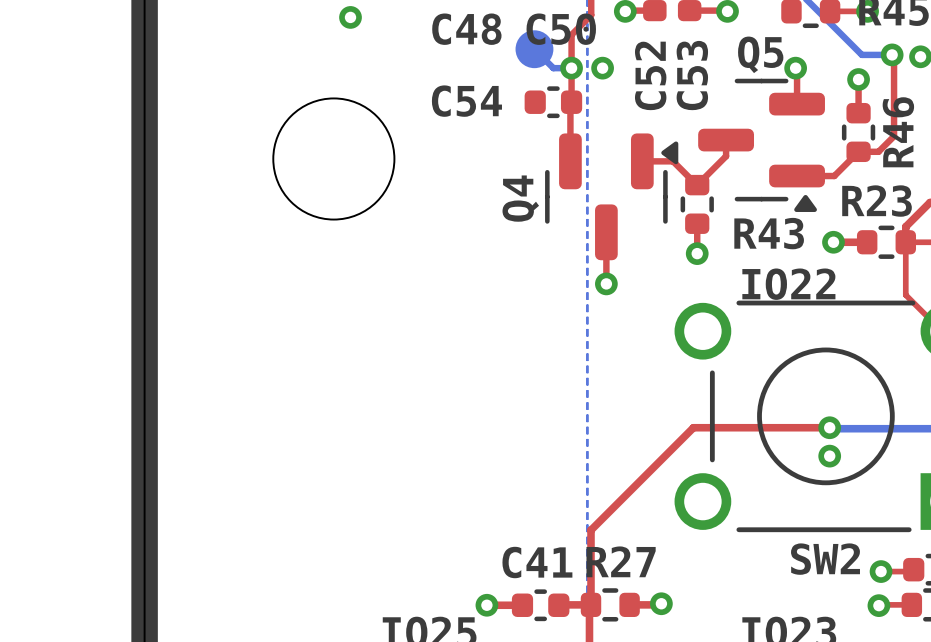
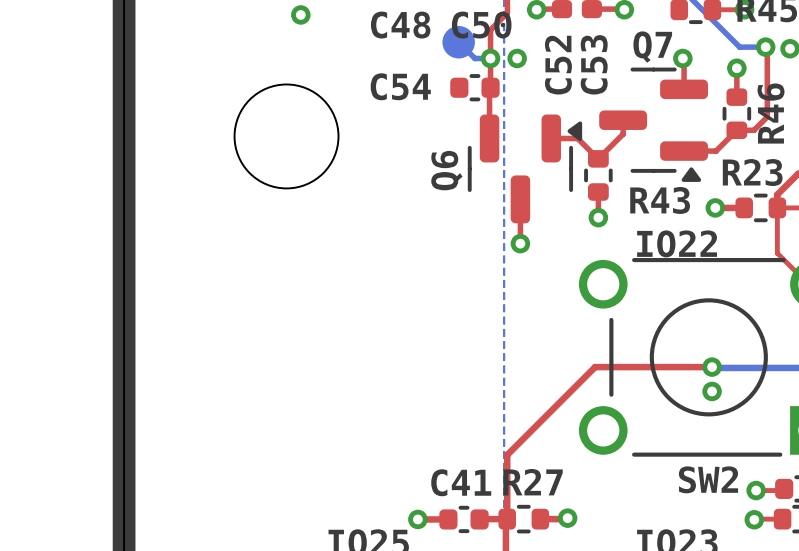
Q5 name: Q5 (760, 54) -> Q7 (652, 47)
Q4 name: Q4 (520, 198) -> Q6 (446, 170)

